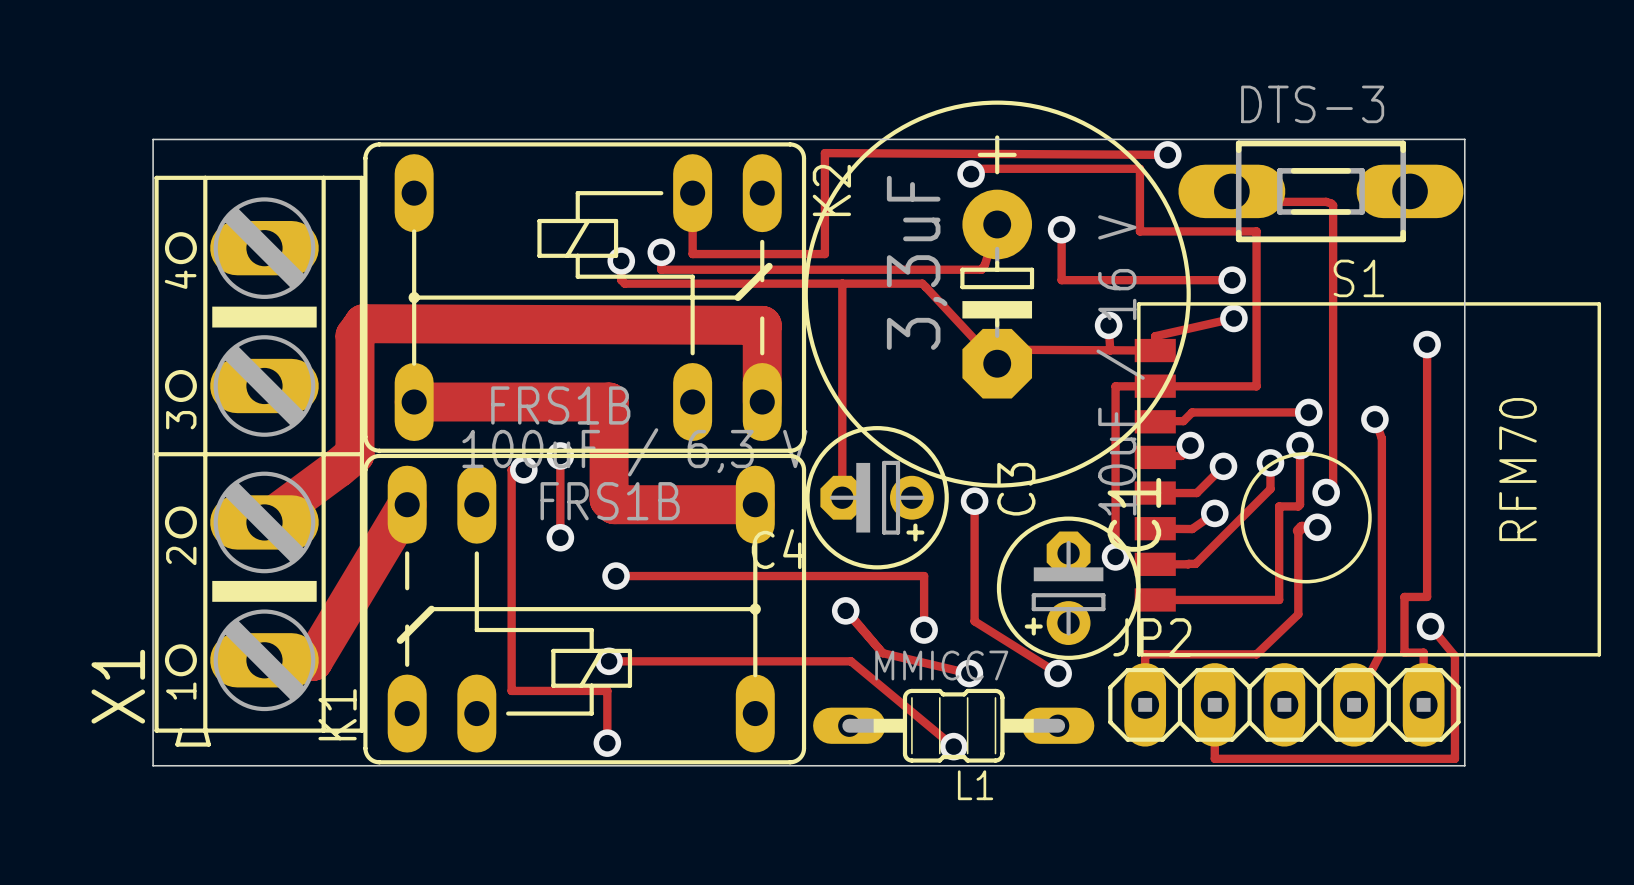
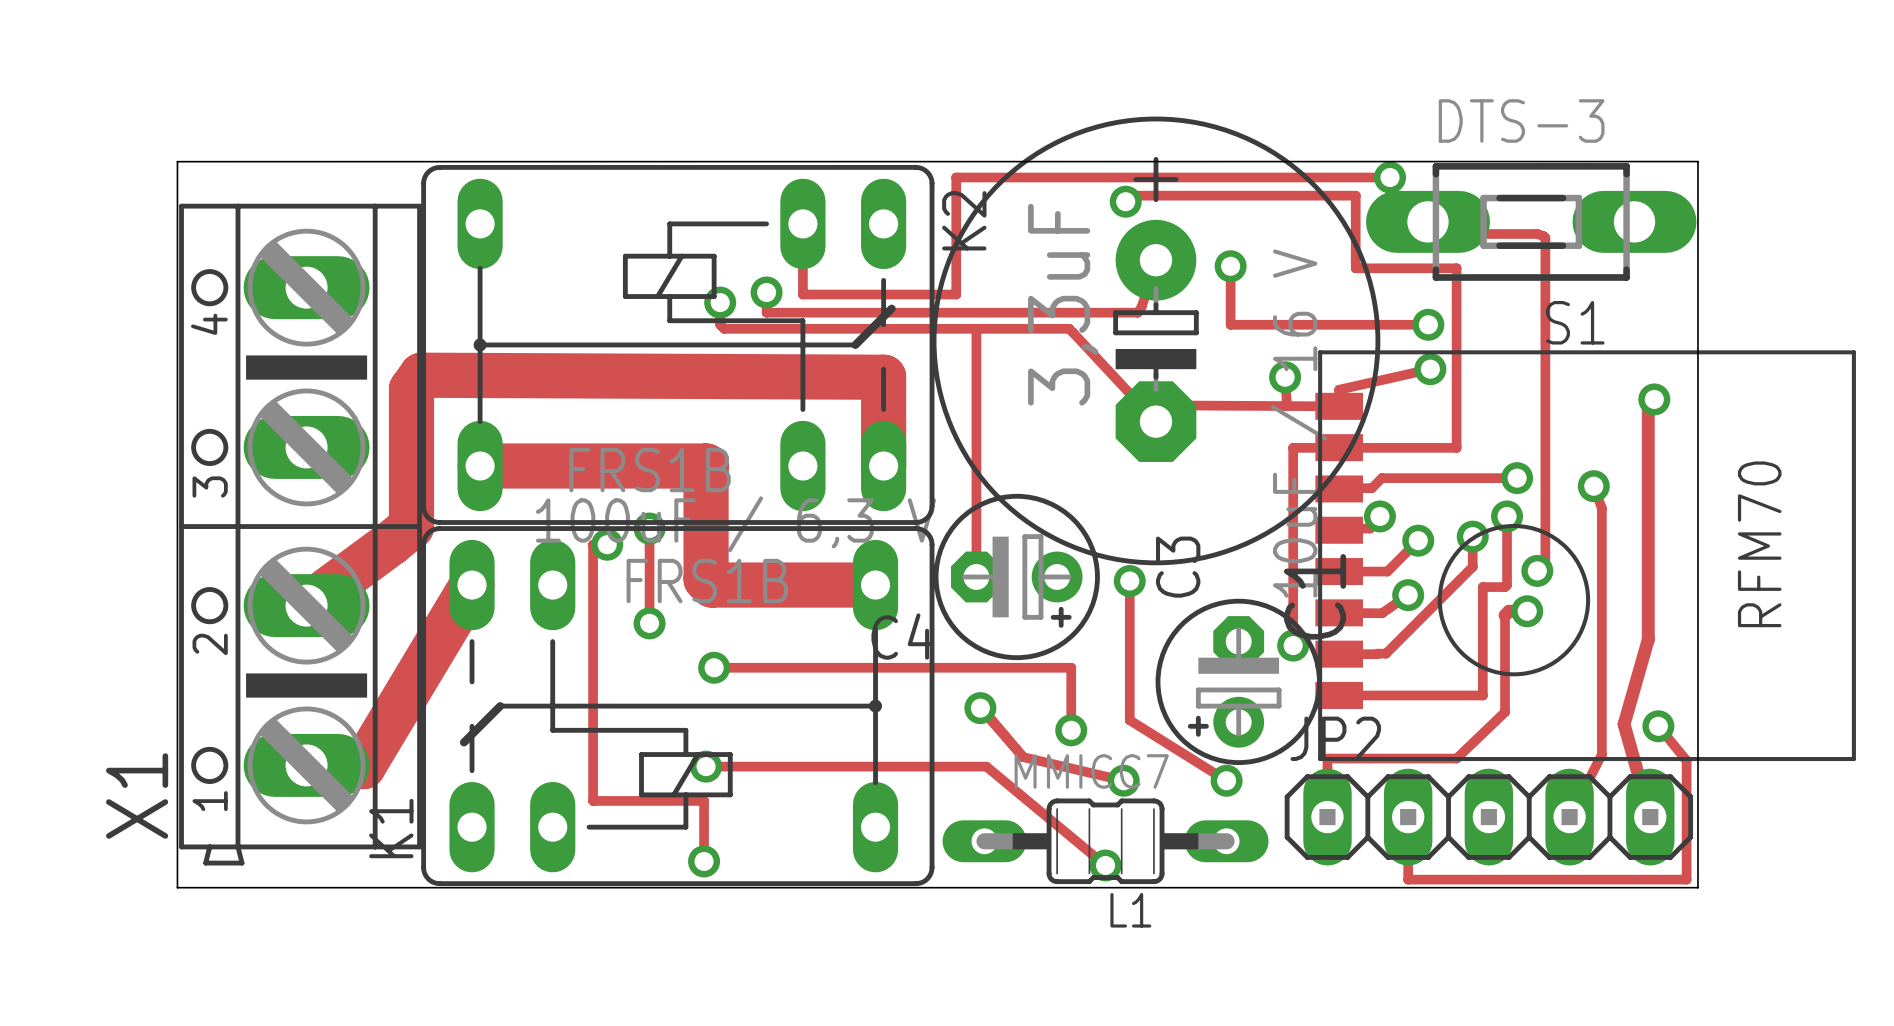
track: (824, 153) (1167, 154) -> (956, 177) (1390, 177)
via position: (1167, 154) -> (1390, 177)
track: (1139, 168) (1139, 231) (1169, 231) -> (1321, 195) (1355, 195) (1355, 268)
track: (1427, 344) (1427, 596) (1404, 596) (1404, 652) (1423, 652) (1423, 704) -> (1648, 393) (1648, 639) (1624, 724) (1650, 817)

